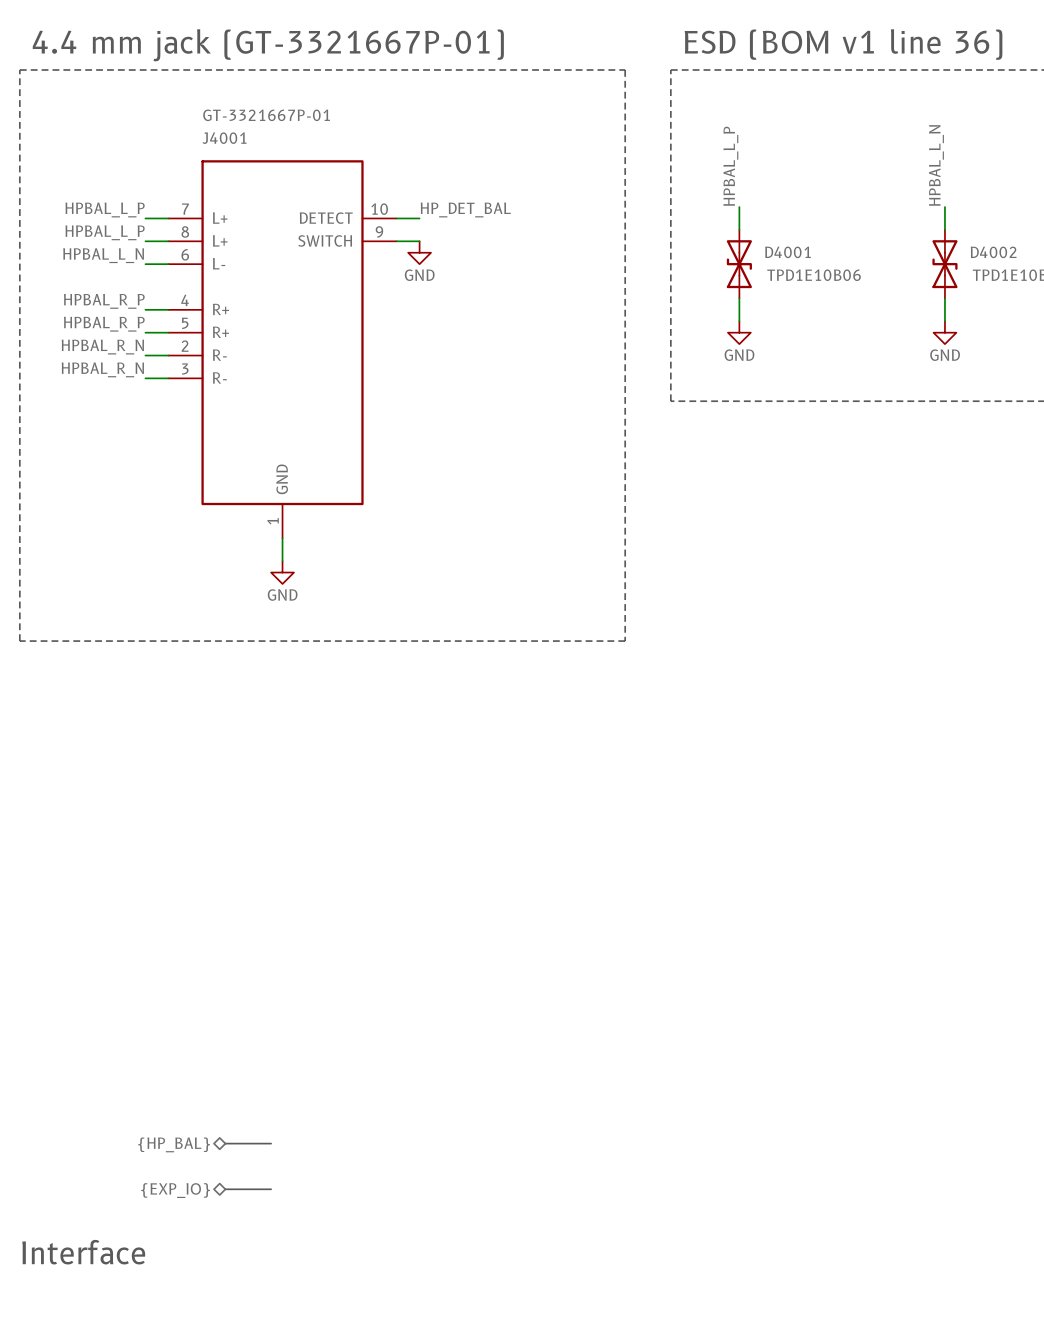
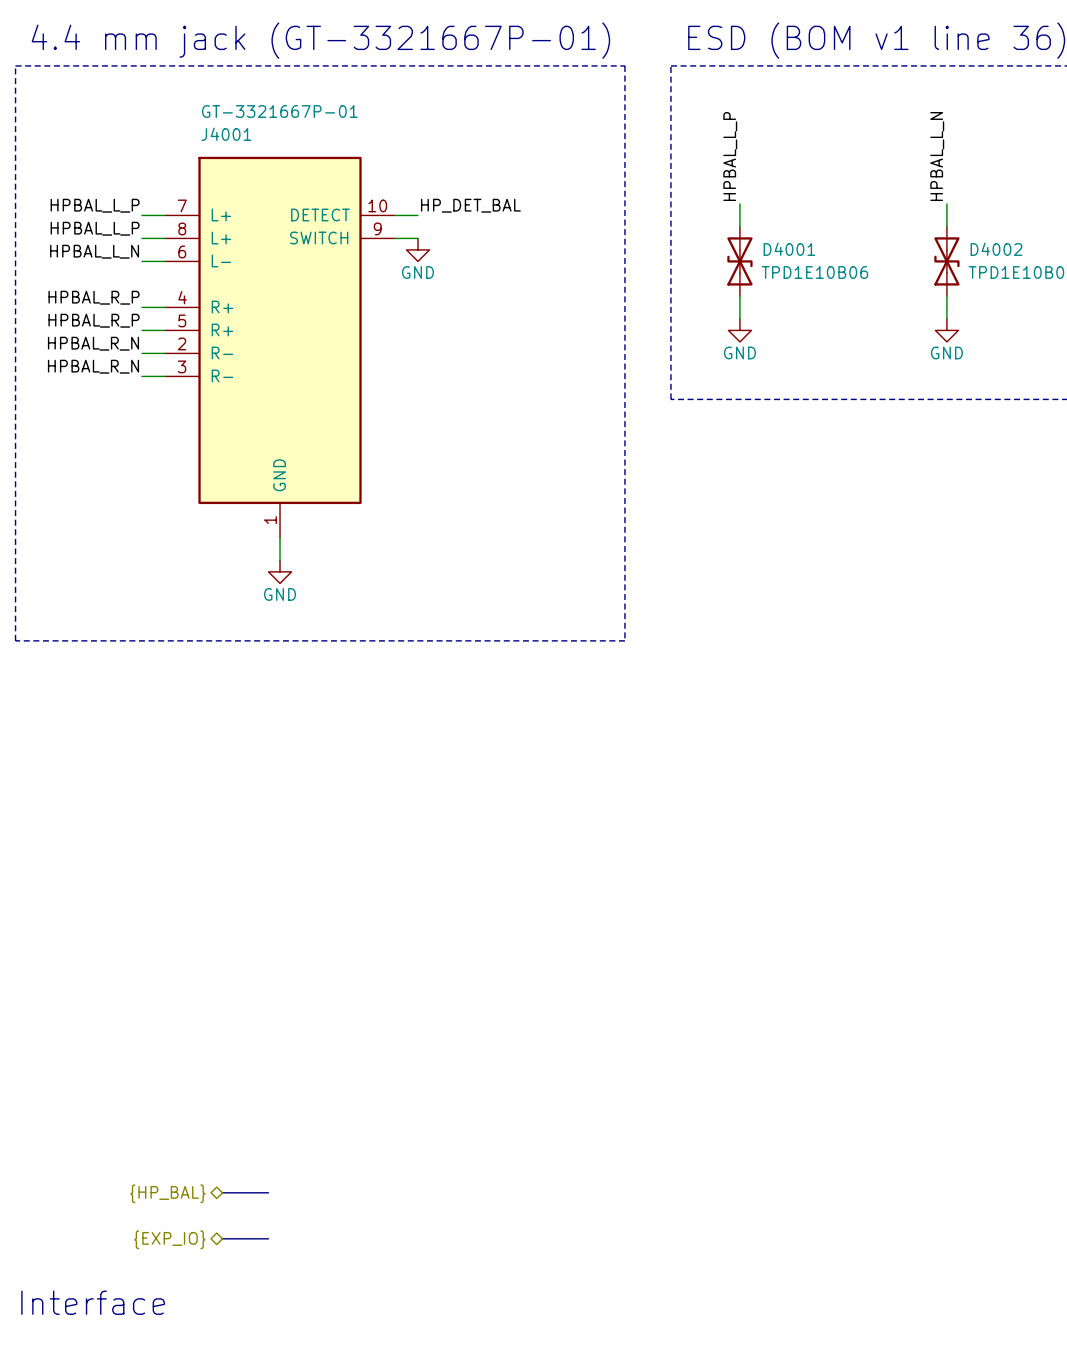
bus: (225, 1143) (271, 1143) -> (222, 1238) (268, 1238)
hierarchical label: {HP_BAL} (174, 1144) -> none
hierarchical label: {EXP_IO} (175, 1190) -> {HP_BAL} (167, 1193)
hierarchical label: none -> {EXP_IO} (169, 1239)
text position: Interface (83, 1252) -> Interface (93, 1302)

